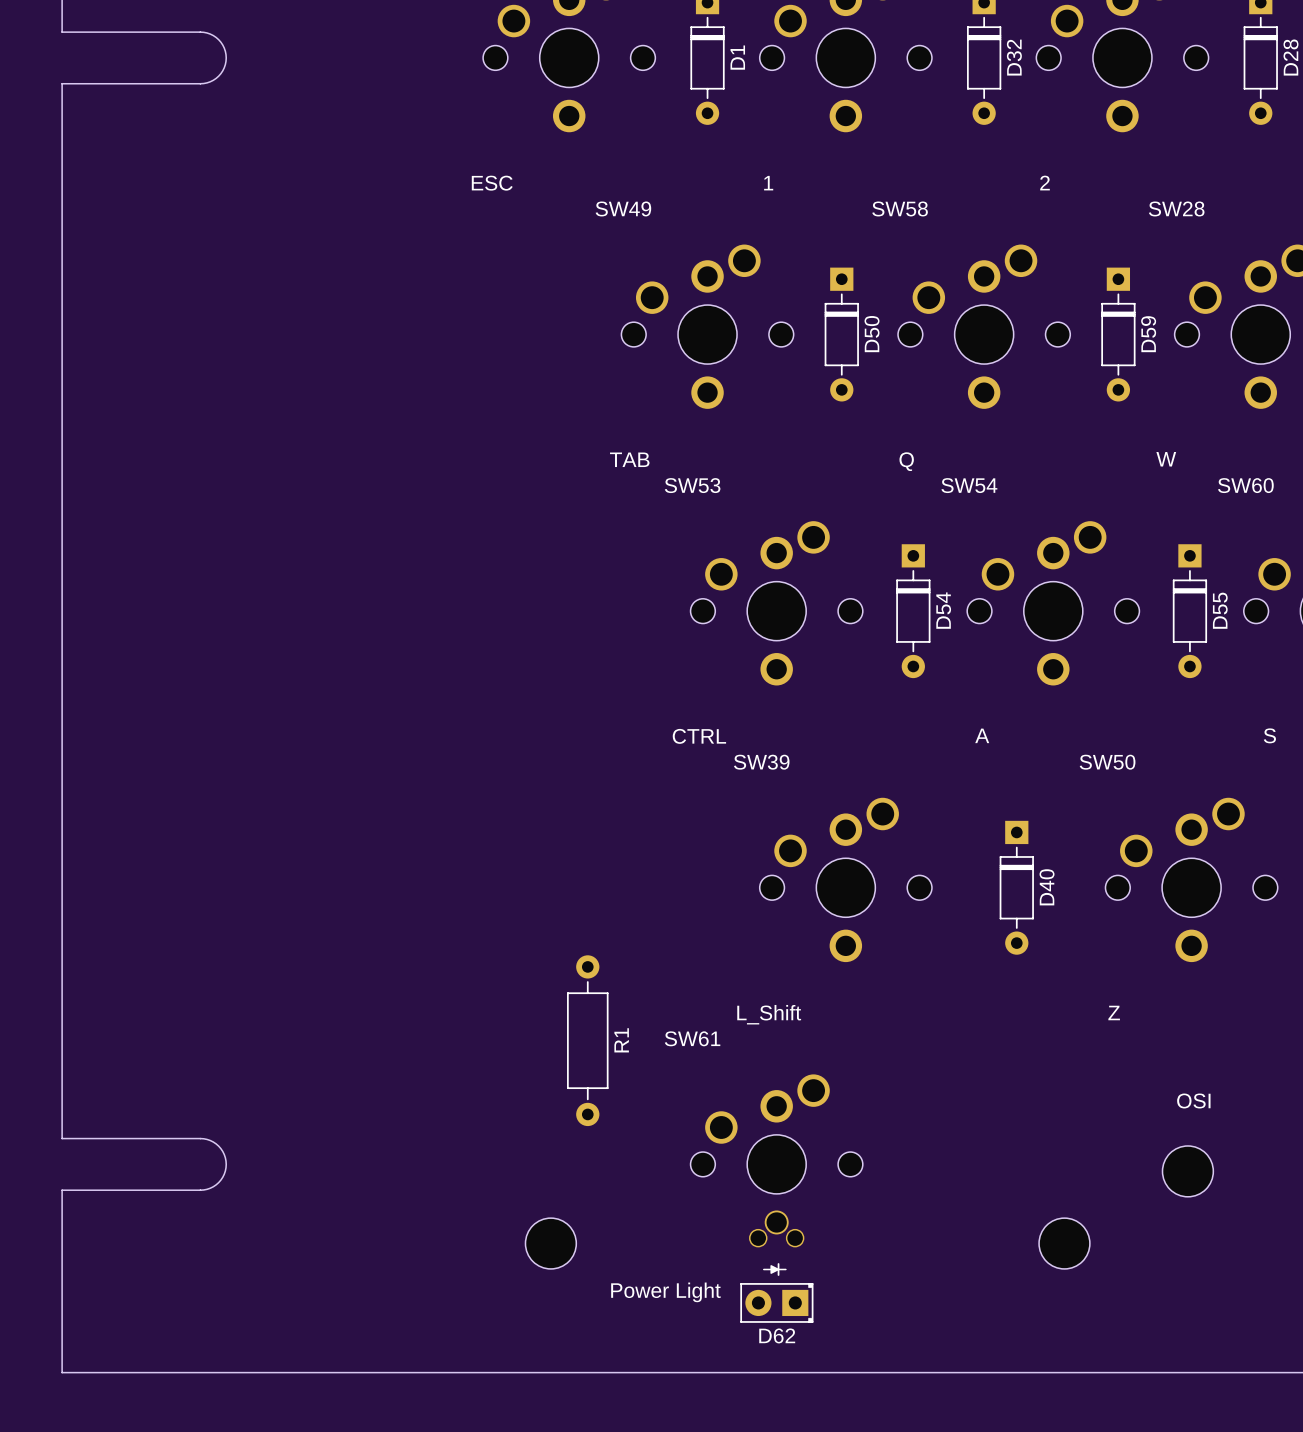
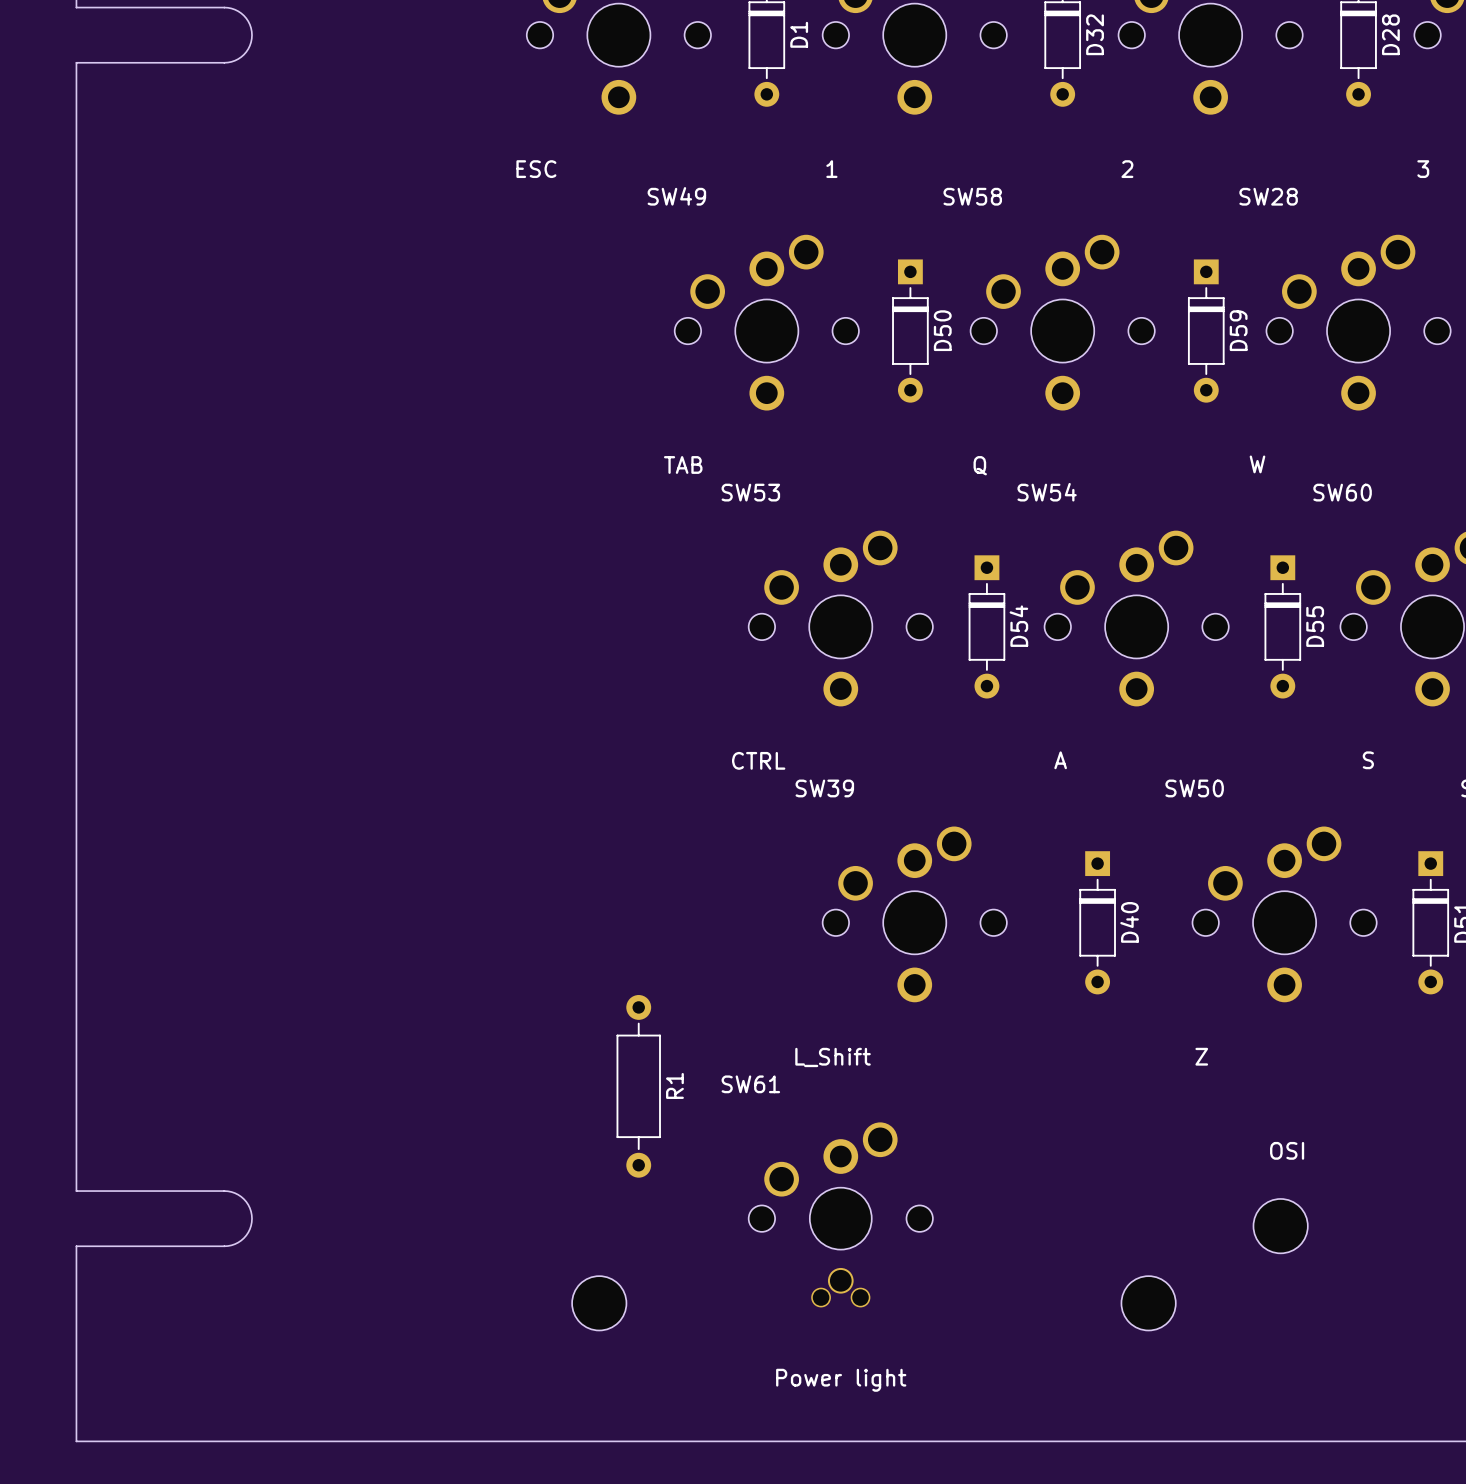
SW61 footprint: [690, 1074, 863, 1276] -> [748, 1122, 933, 1308]
SW61 value: Power Light (665, 1292) -> Power light (841, 1380)
D62: (776, 1302) -> none

